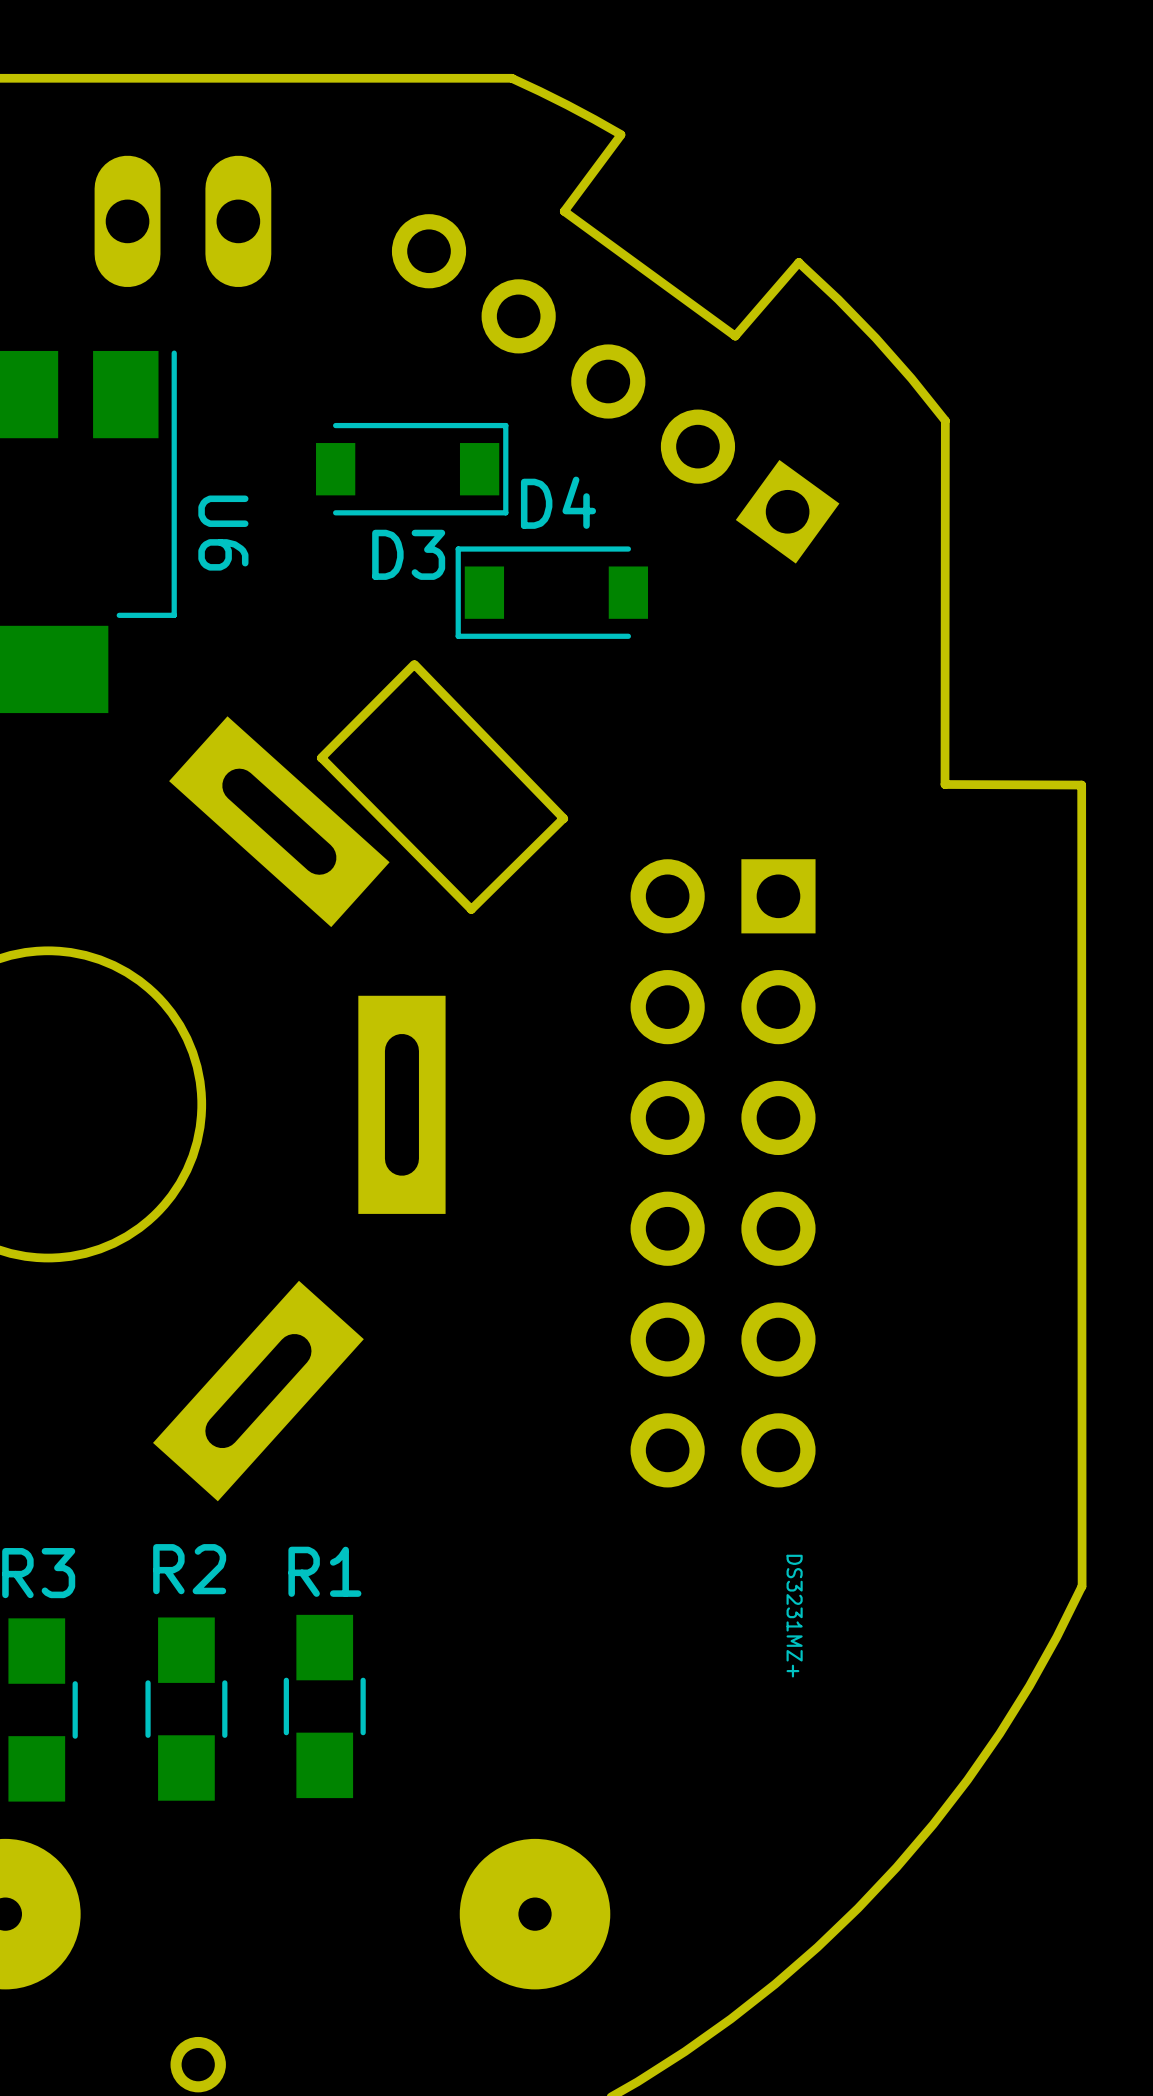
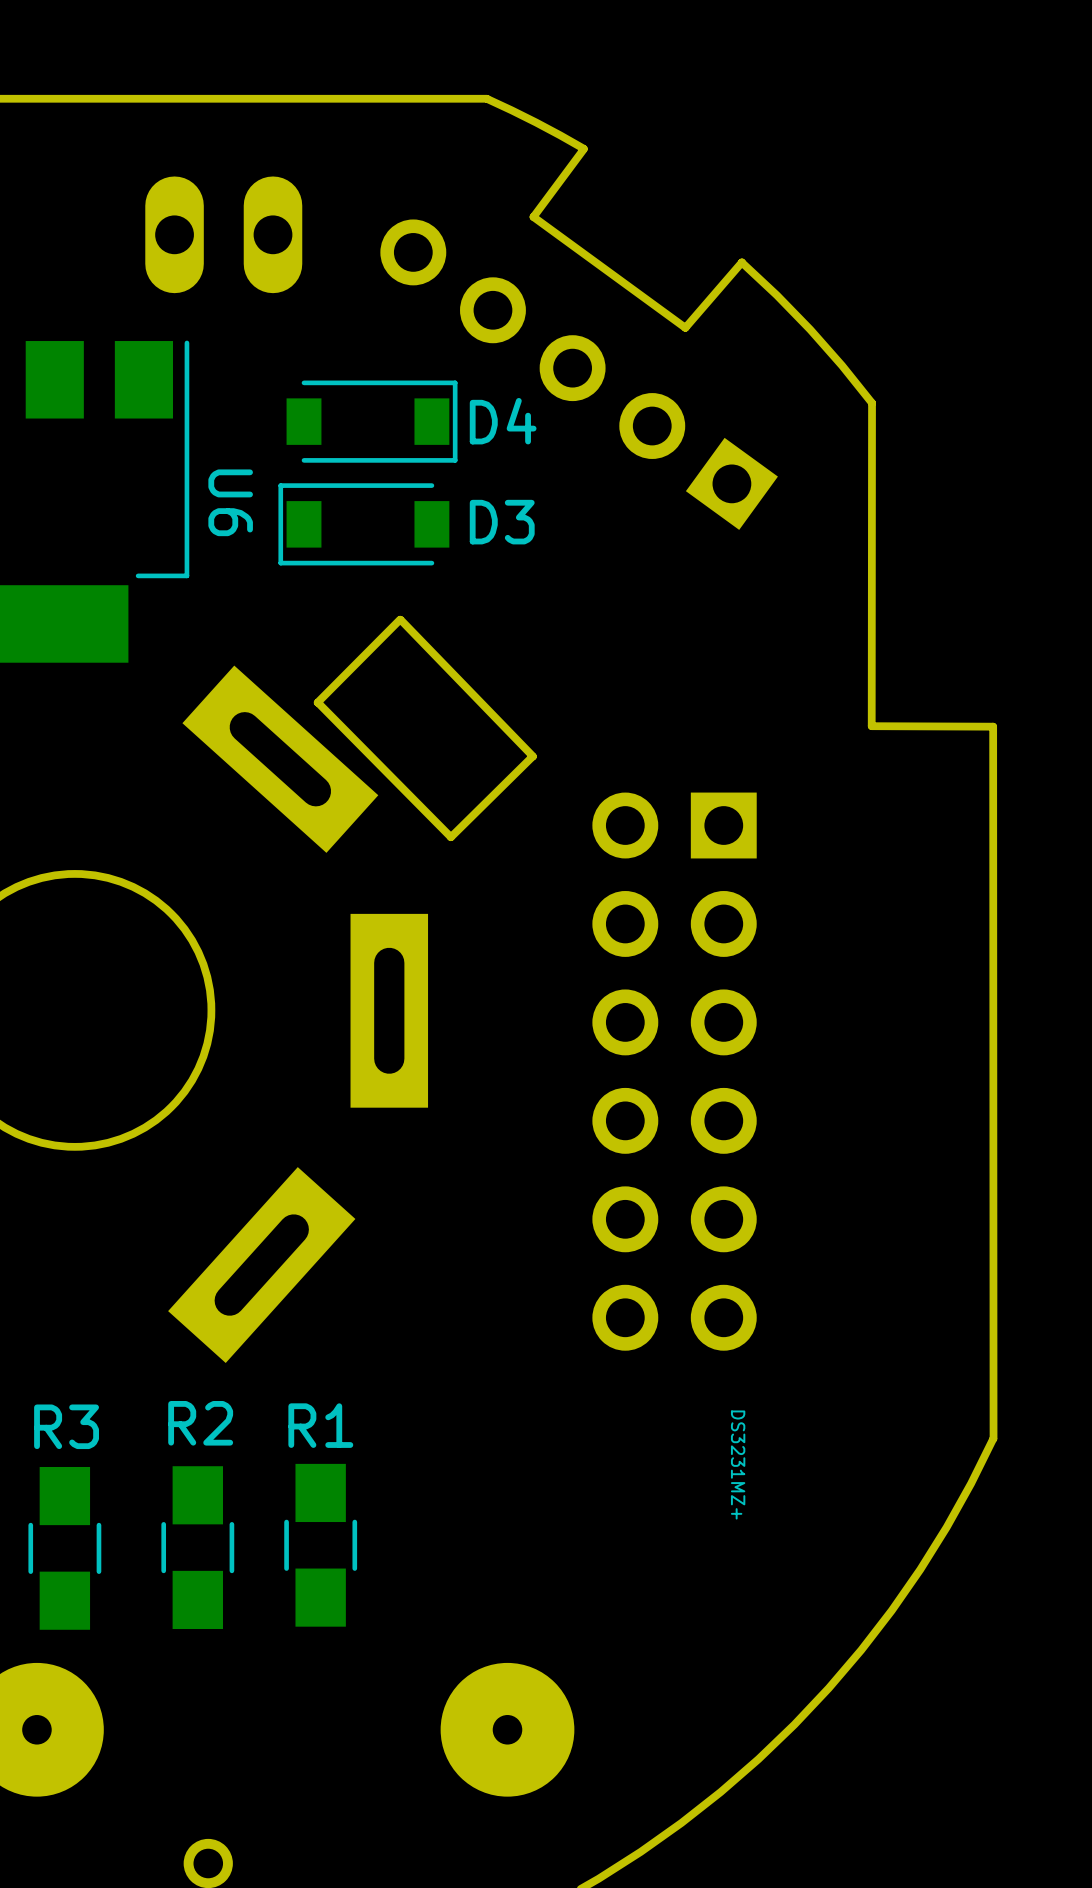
part position: (182, 221) -> (223, 234)
D3 position: (412, 469) -> (372, 421)
D4 name position: D4 (558, 502) -> D4 (503, 421)
D3 name position: D3 (408, 554) -> D3 (502, 522)
D4 position: (551, 592) -> (363, 524)

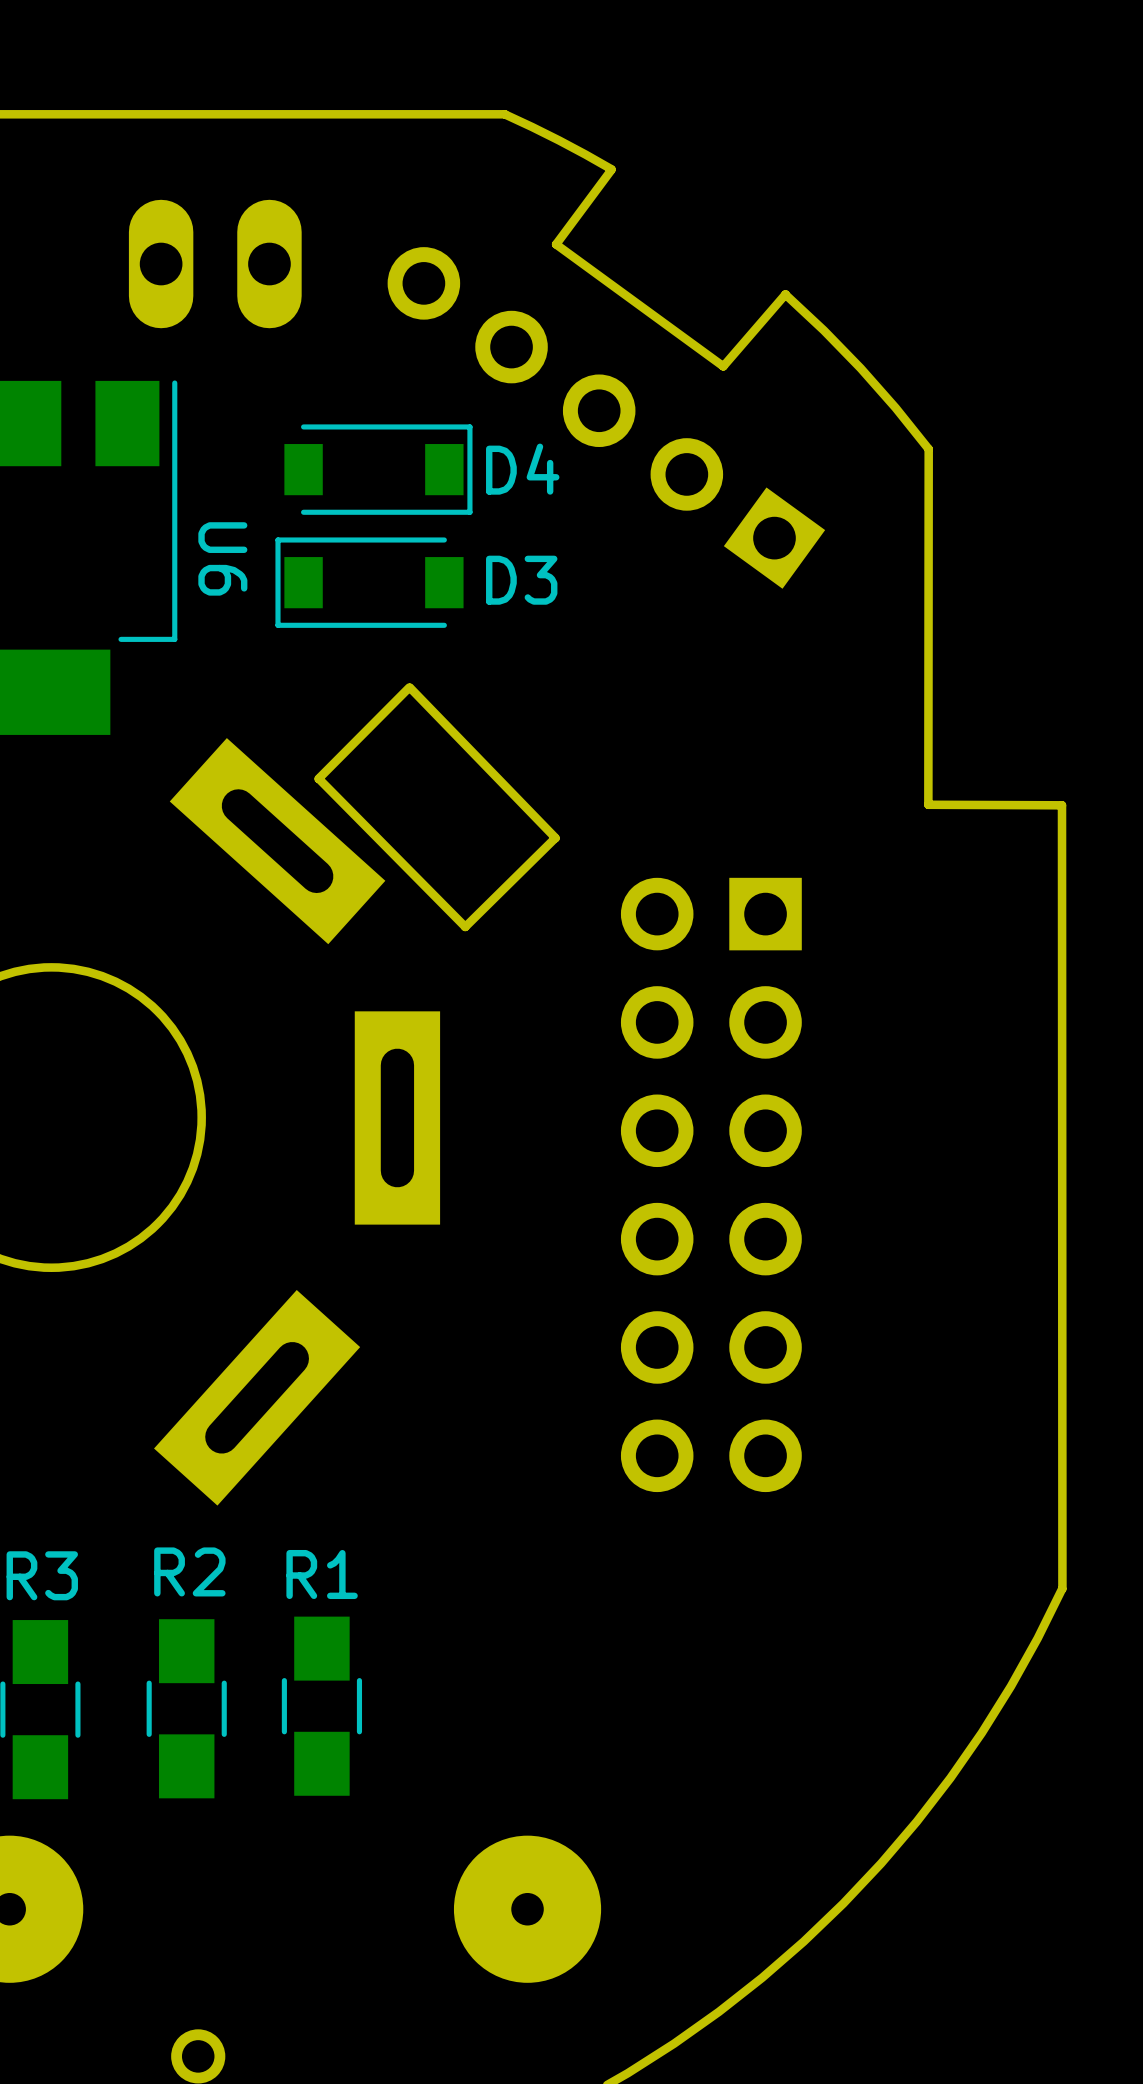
part: DS3231MZ+ (738, 1465) -> none

